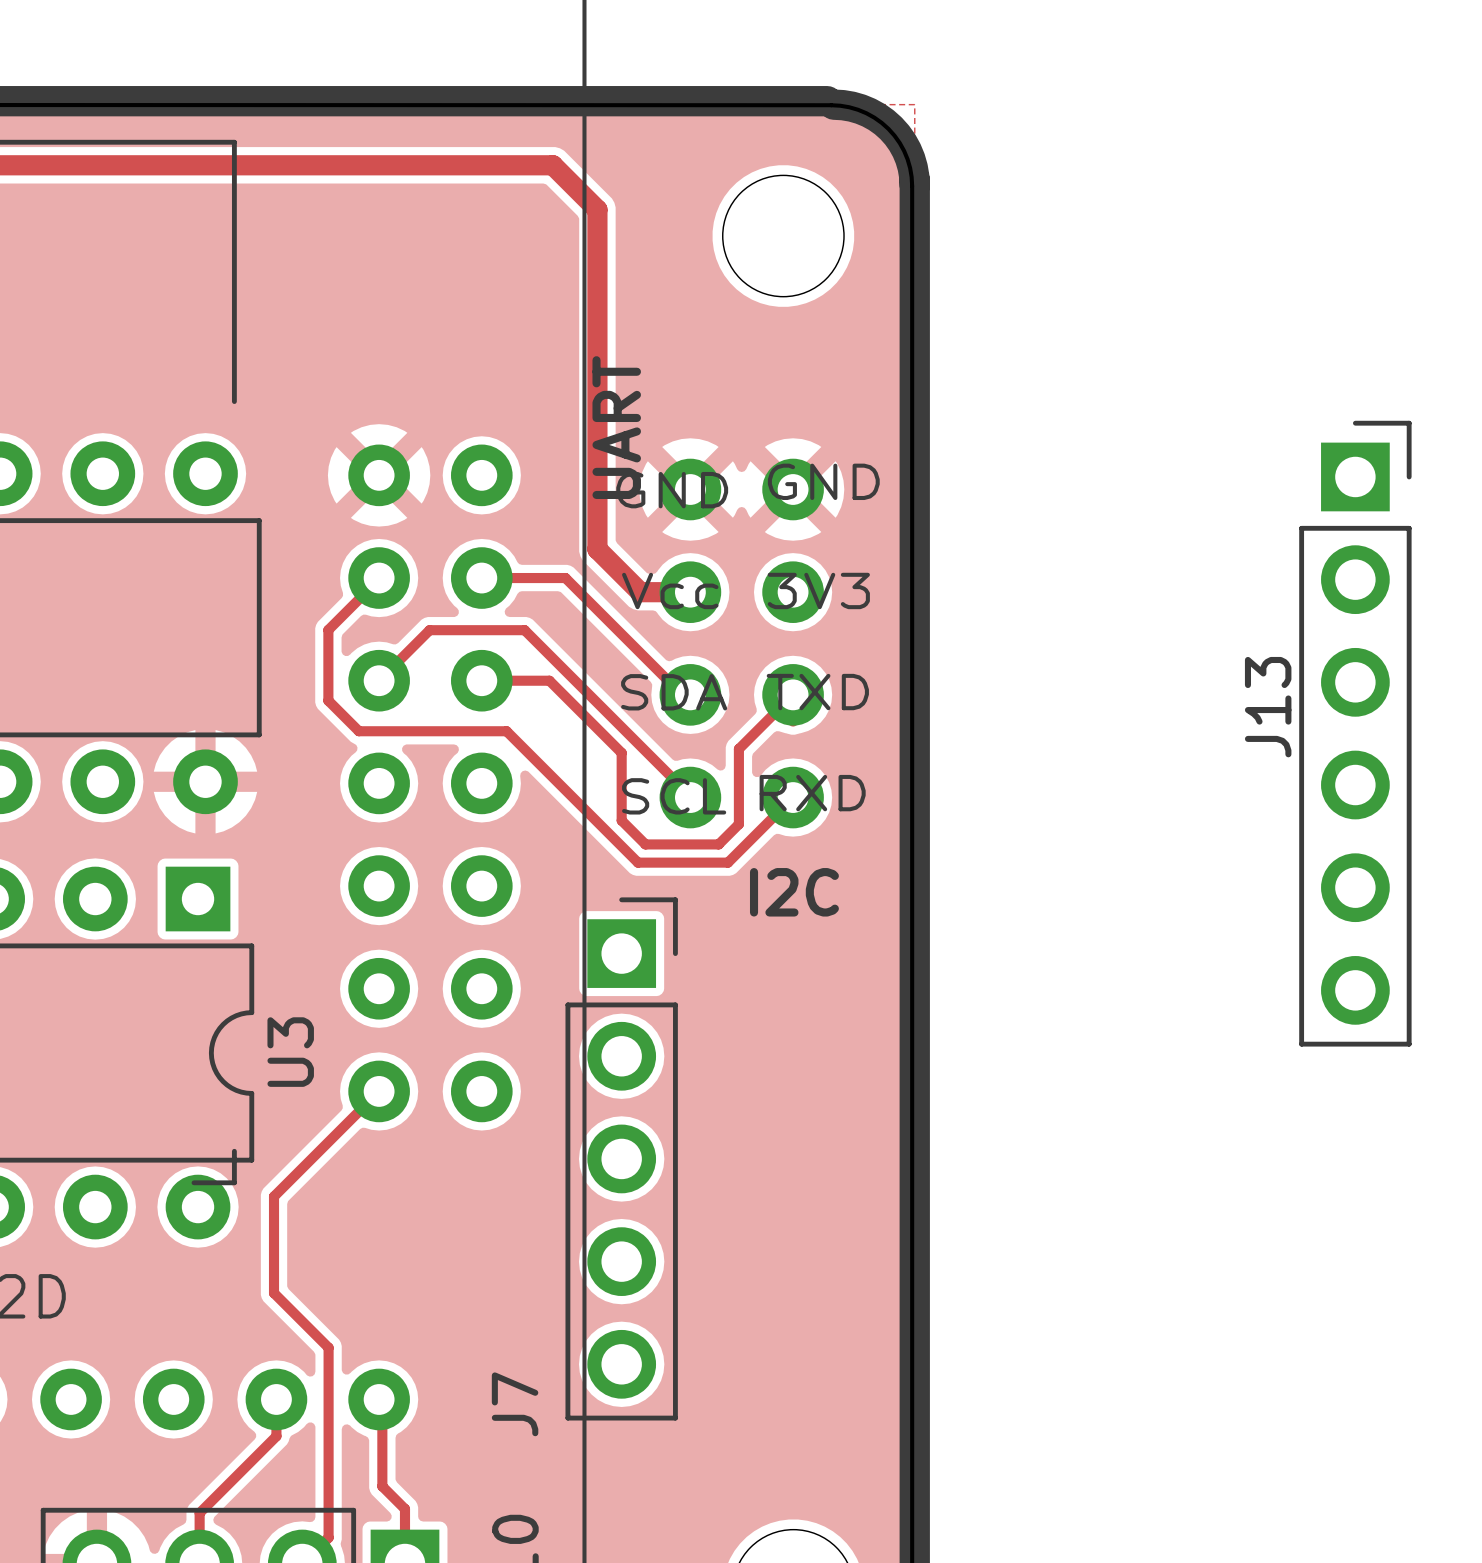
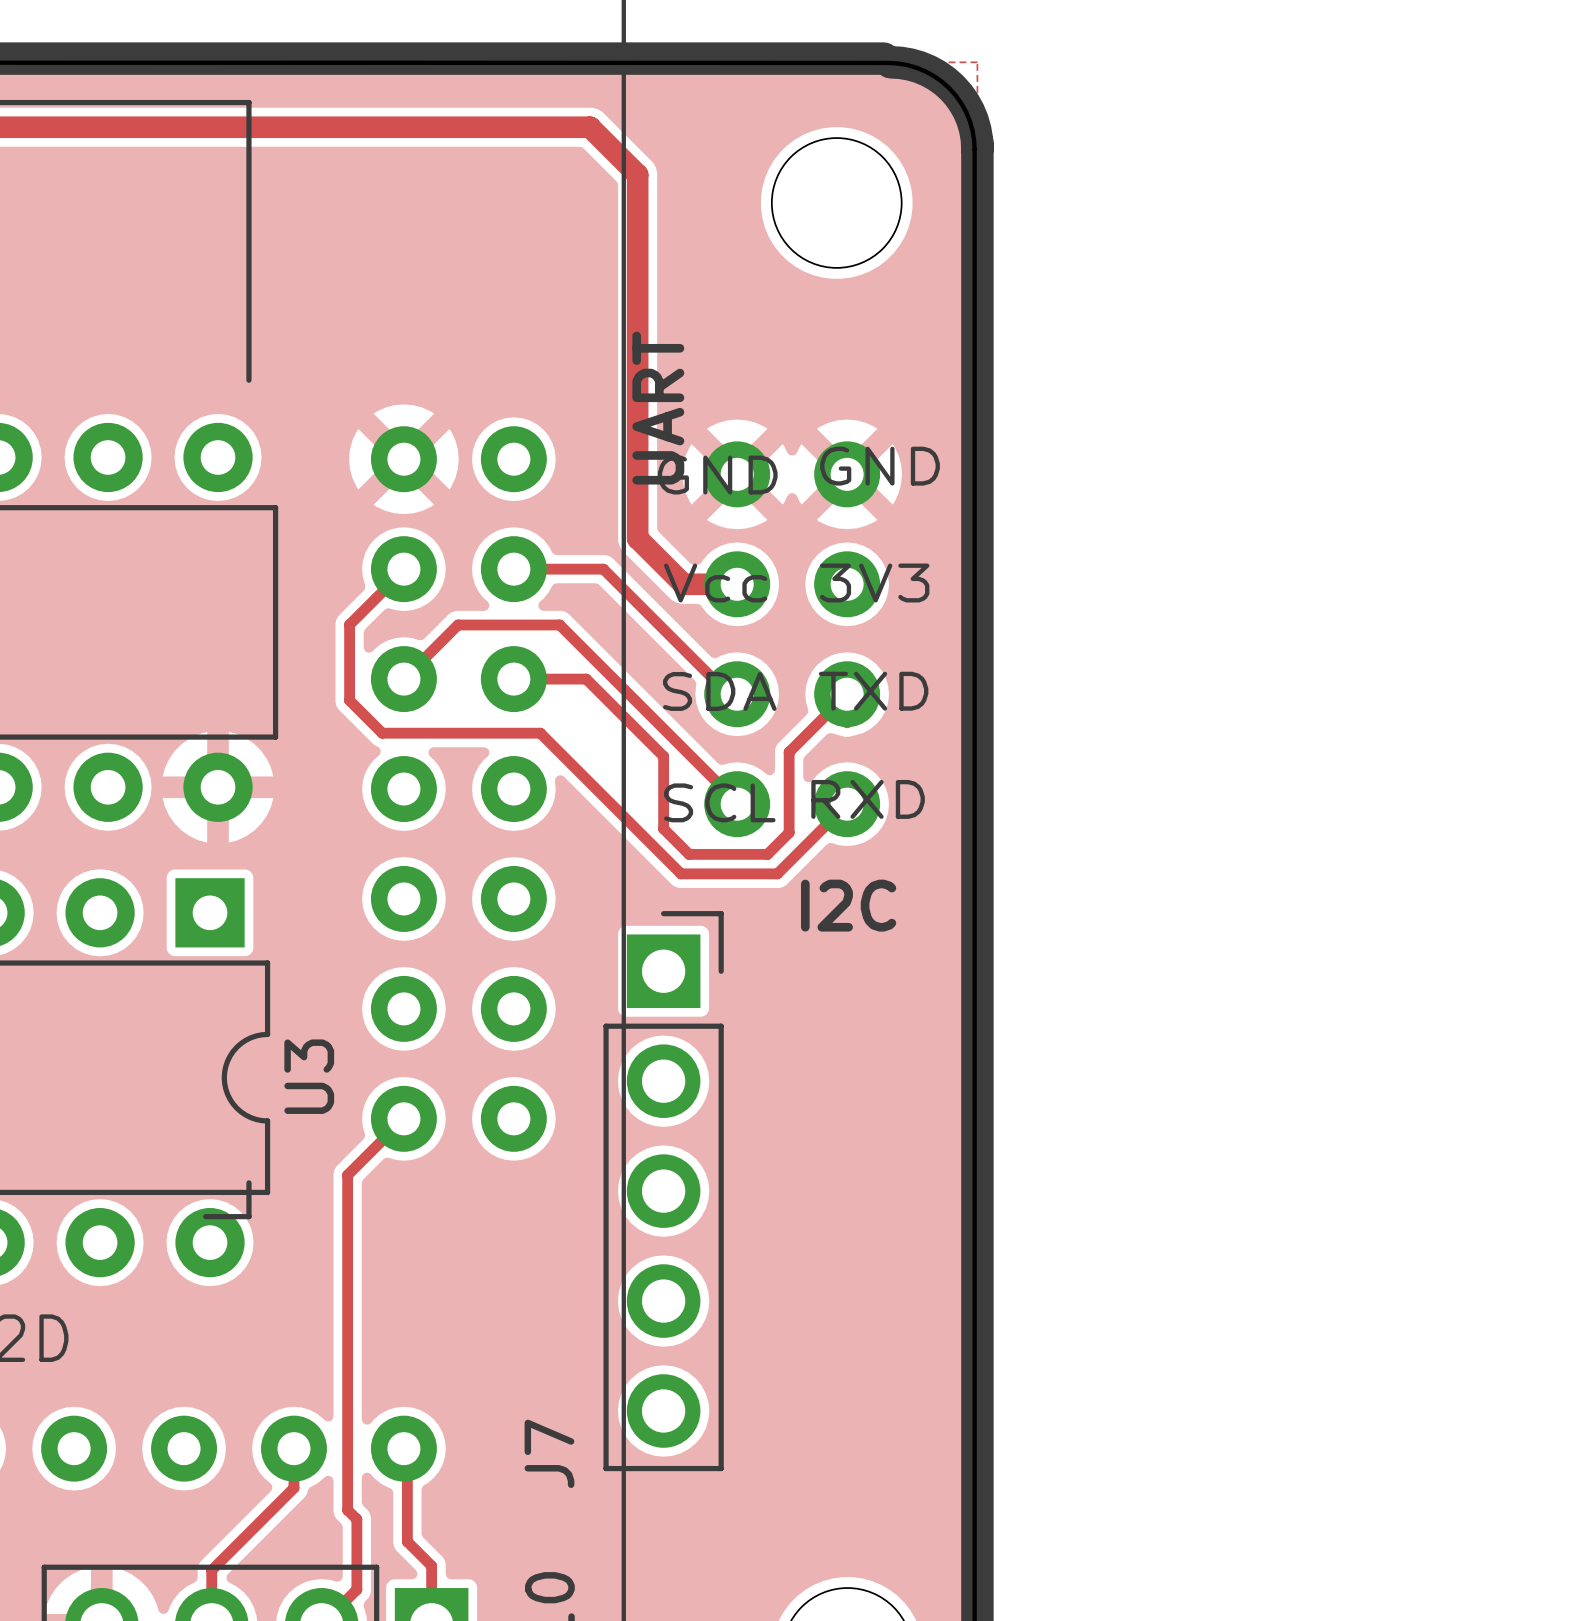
J13: (1355, 733) -> none
track: (326, 1143) (274, 1196) (274, 1293) (328, 1347) (328, 1537) -> (347, 1175) (347, 1510) (356, 1519) (356, 1589) (349, 1596)

